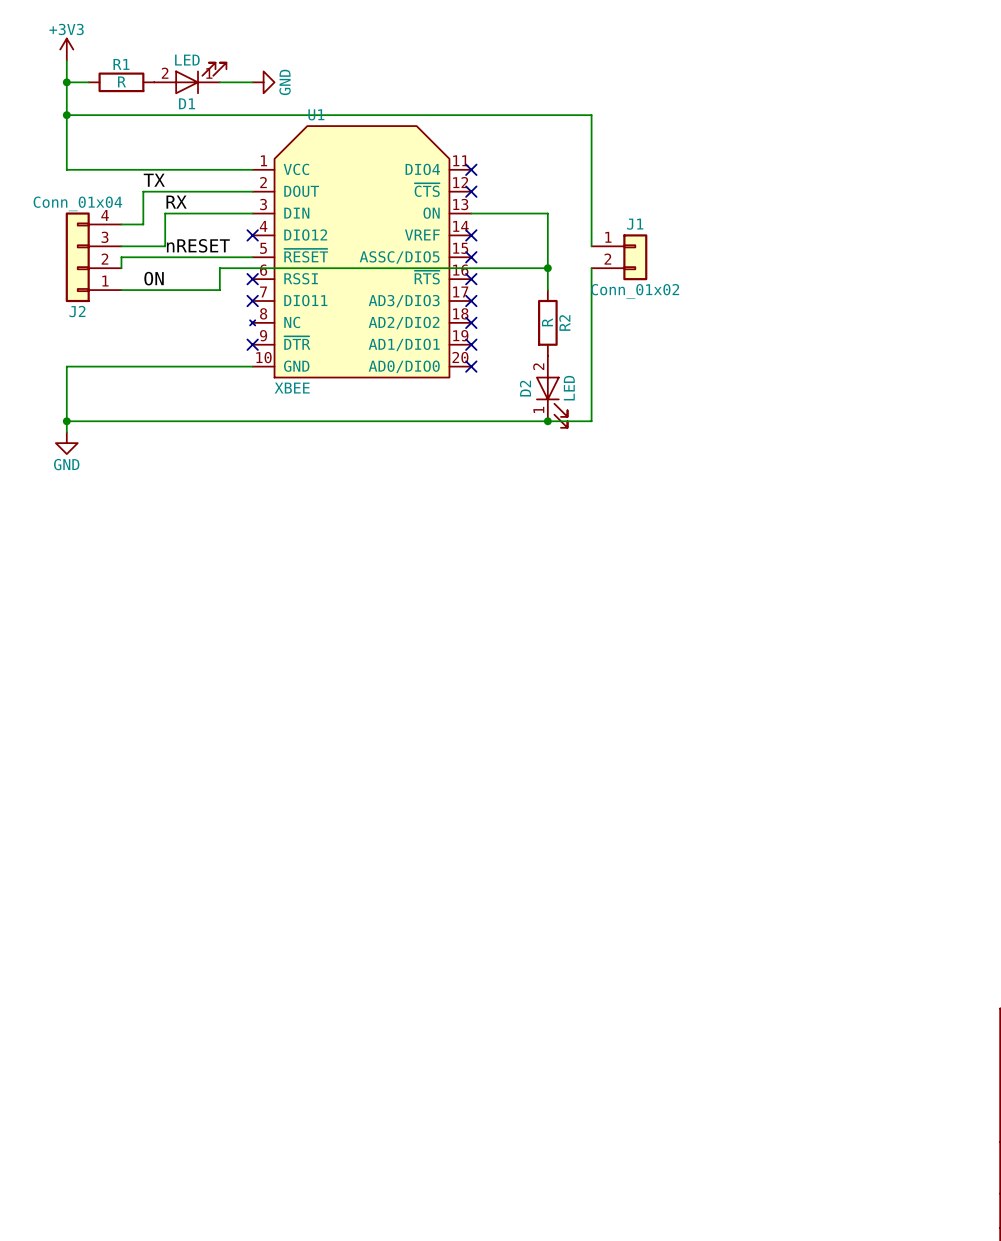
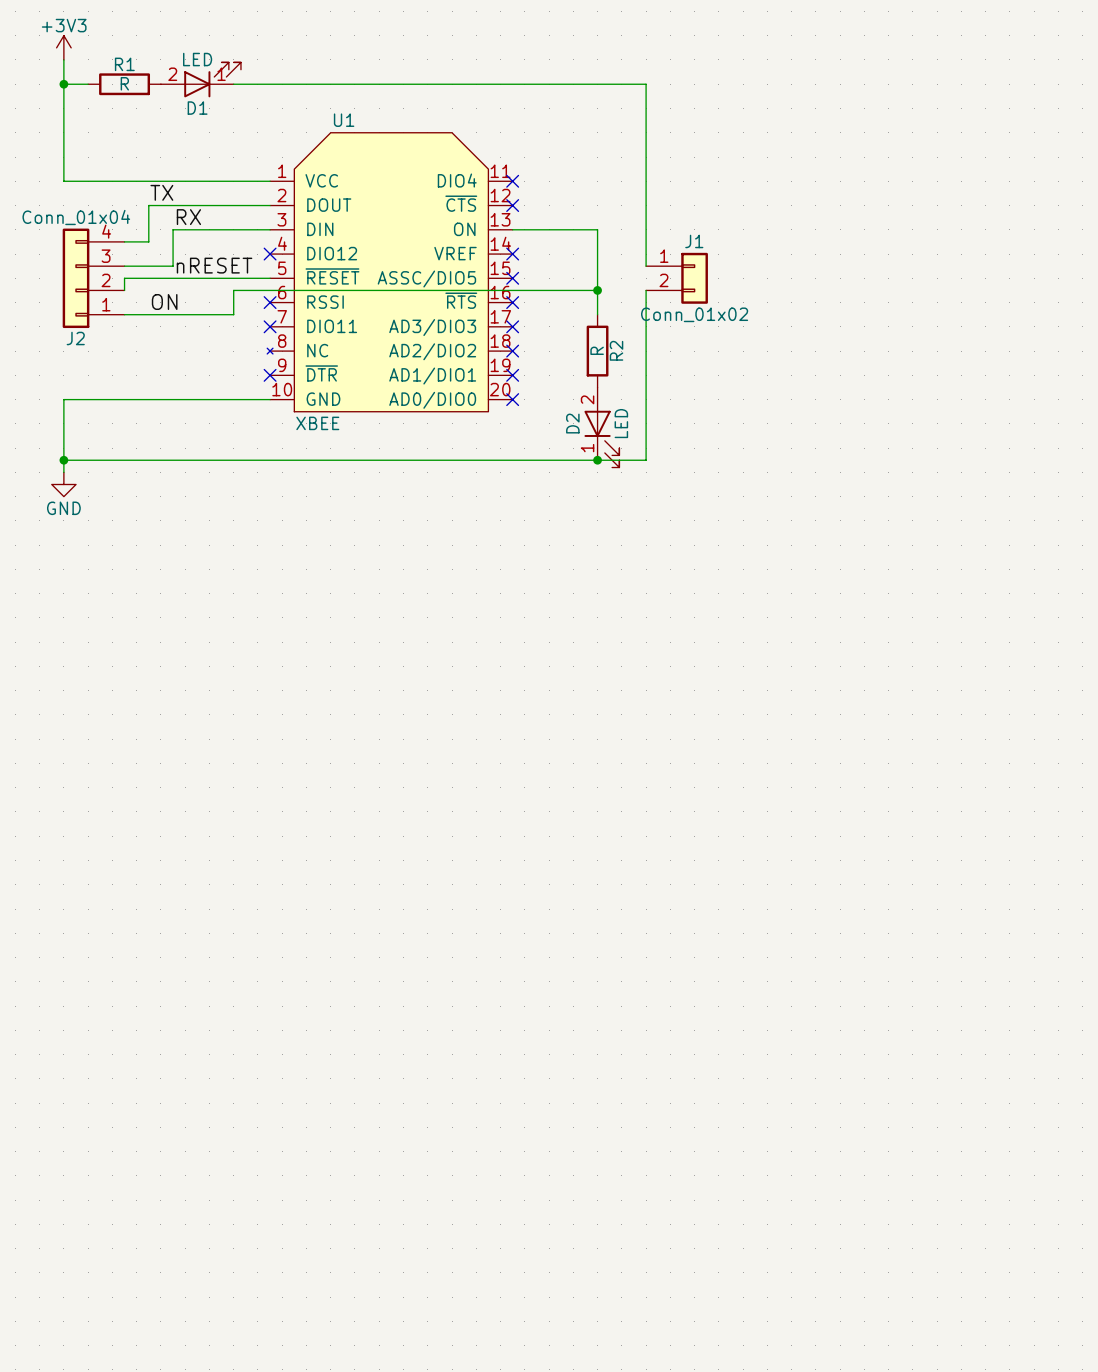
power symbol: GND (263, 82) -> none
wire: (66, 115) (591, 115) -> (270, 84) (646, 84) (646, 120)
junction: (66, 115) -> none

